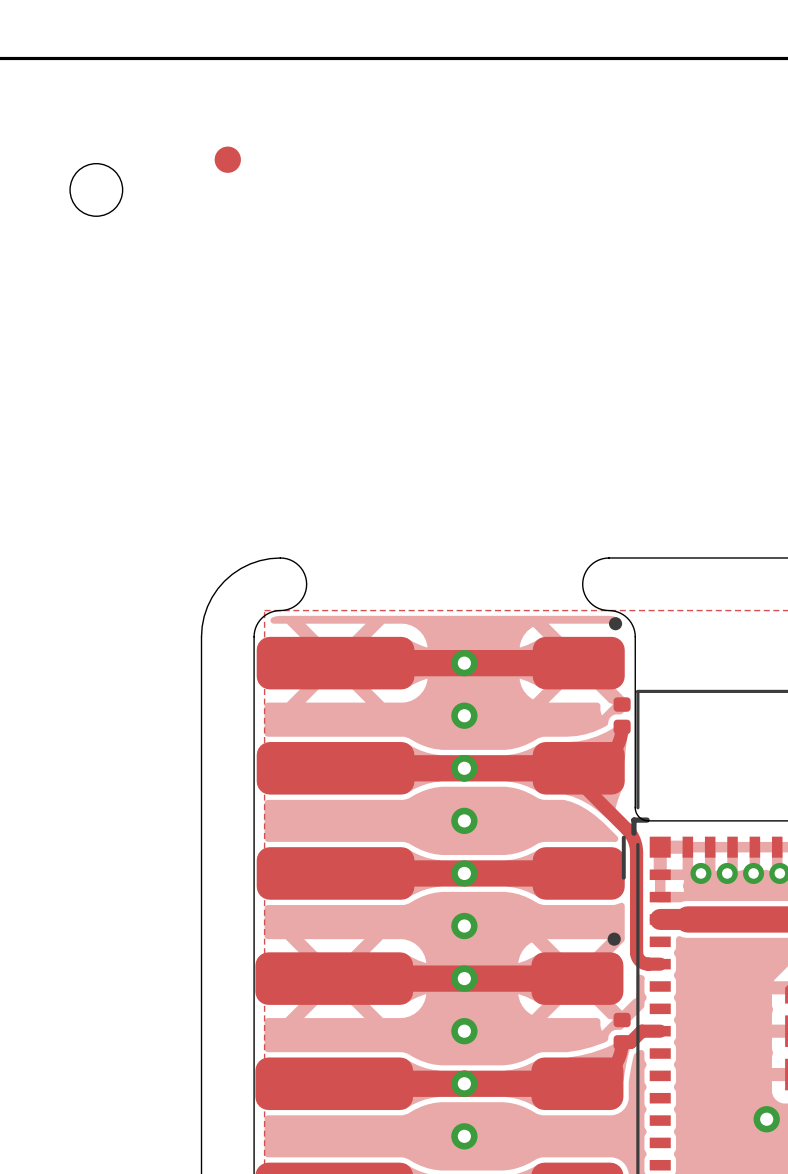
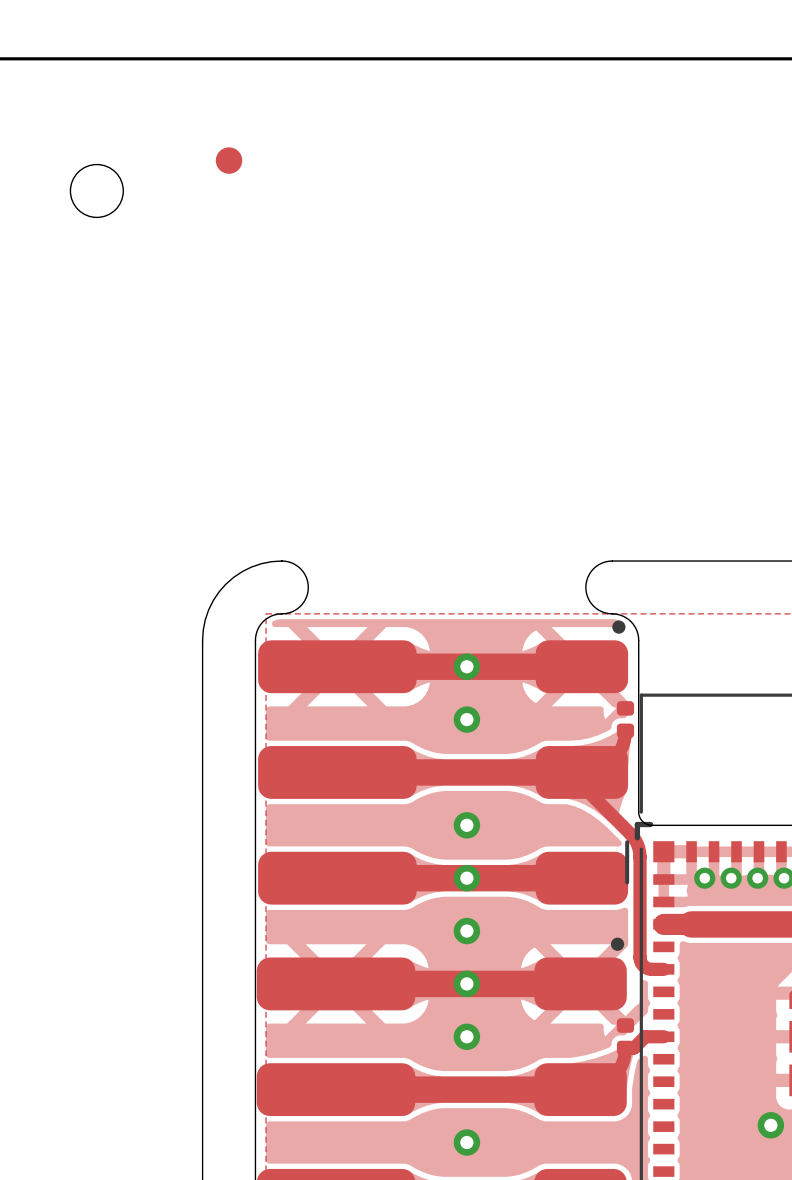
via: (464, 768) -> none
via: (464, 1083) -> none

